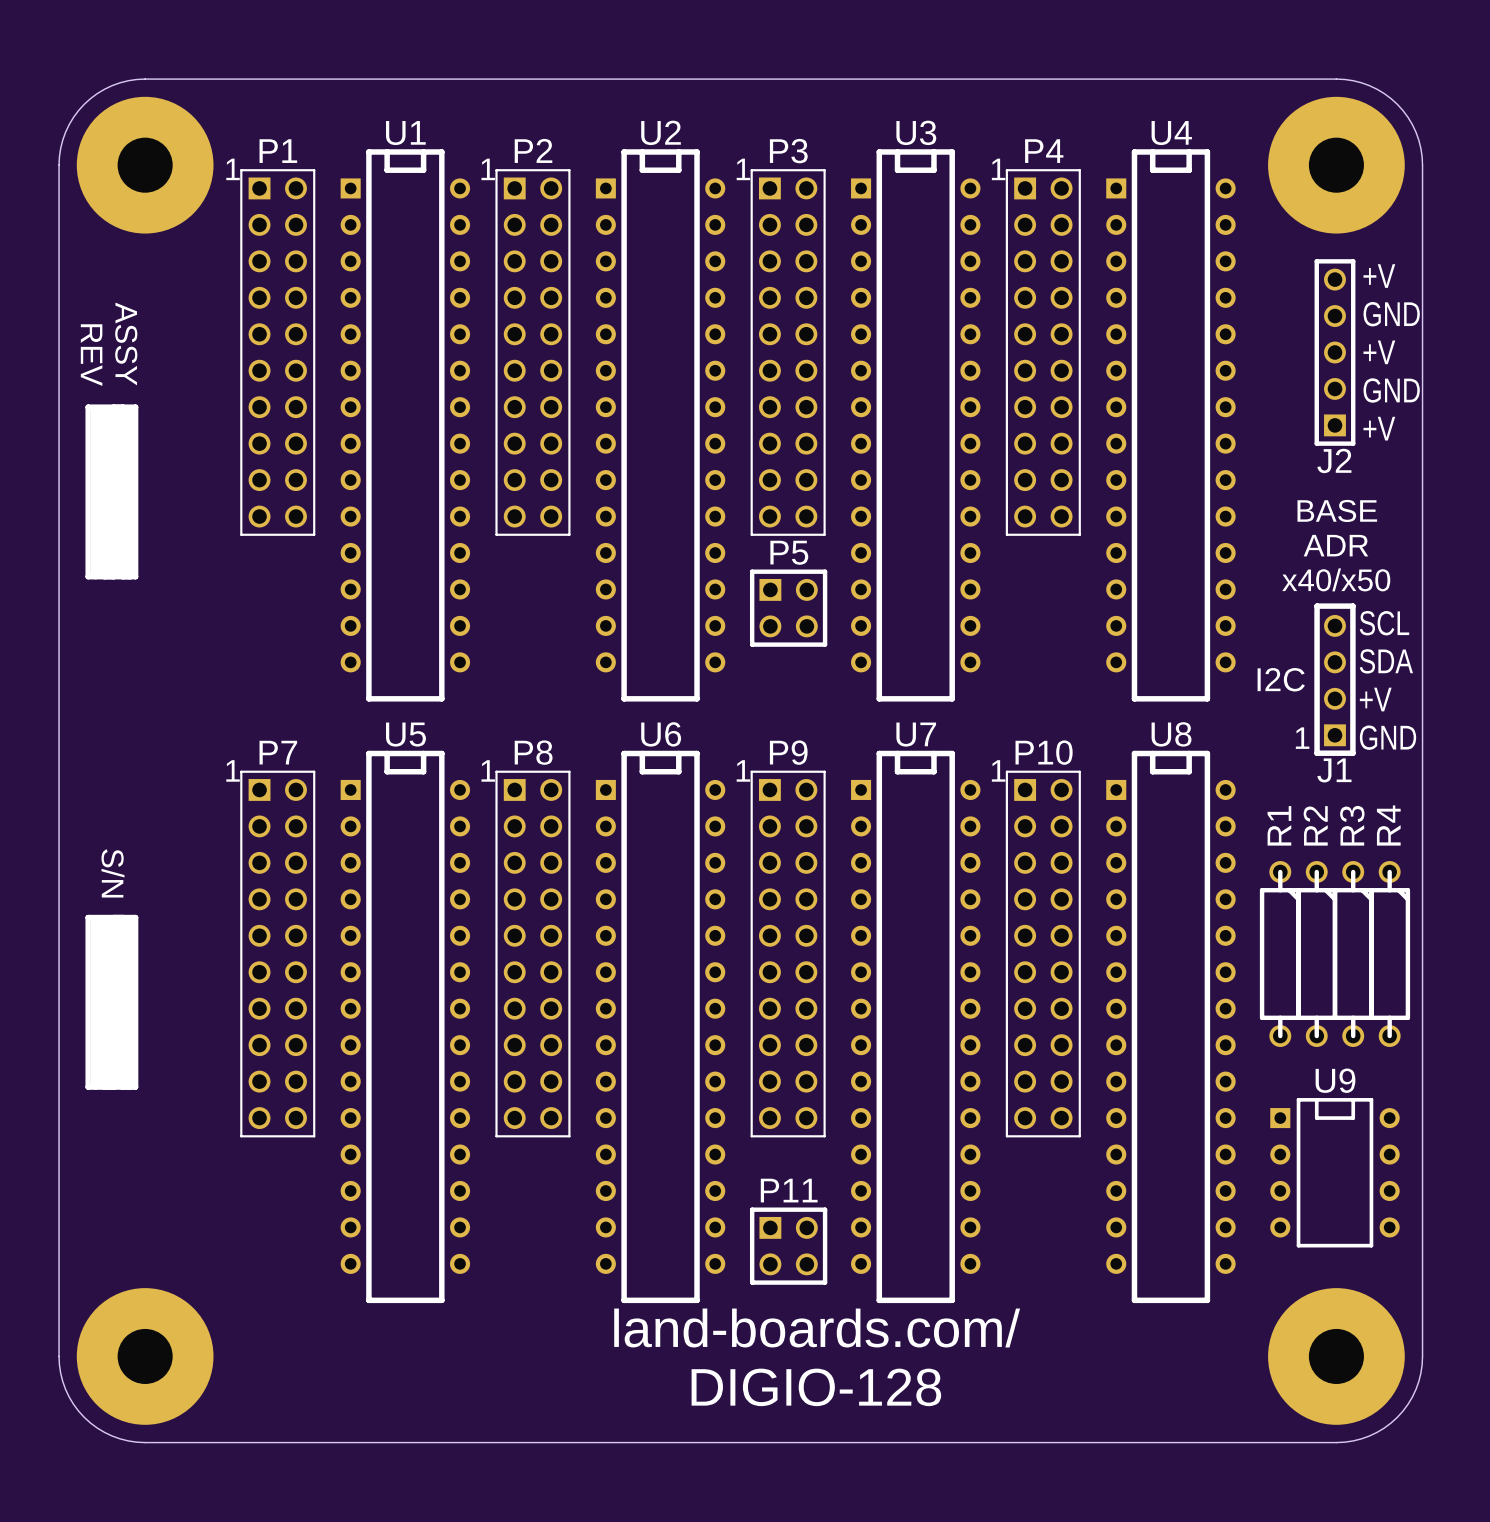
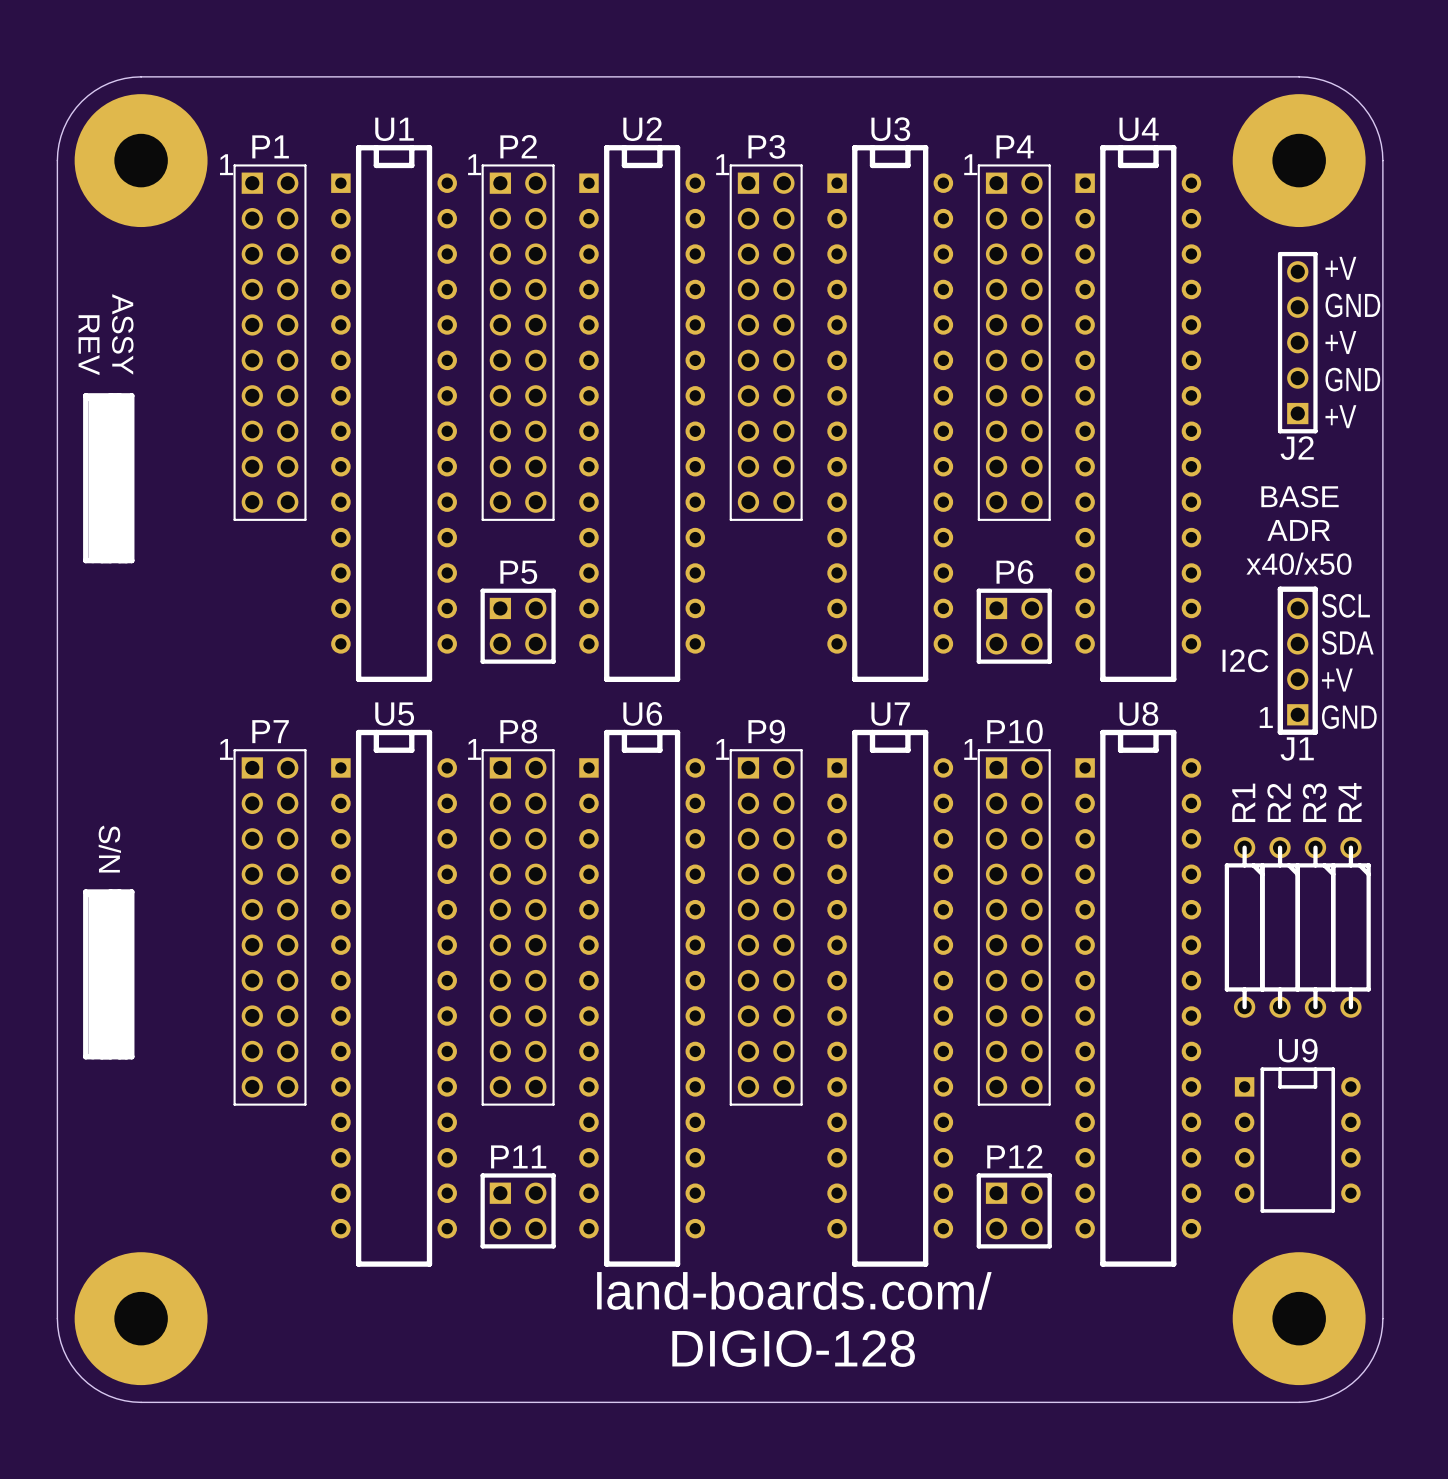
P5 position: (788, 608) -> (518, 626)
P6: none -> (1014, 626)
P12: none -> (1014, 1210)
P11 position: (788, 1246) -> (518, 1210)

